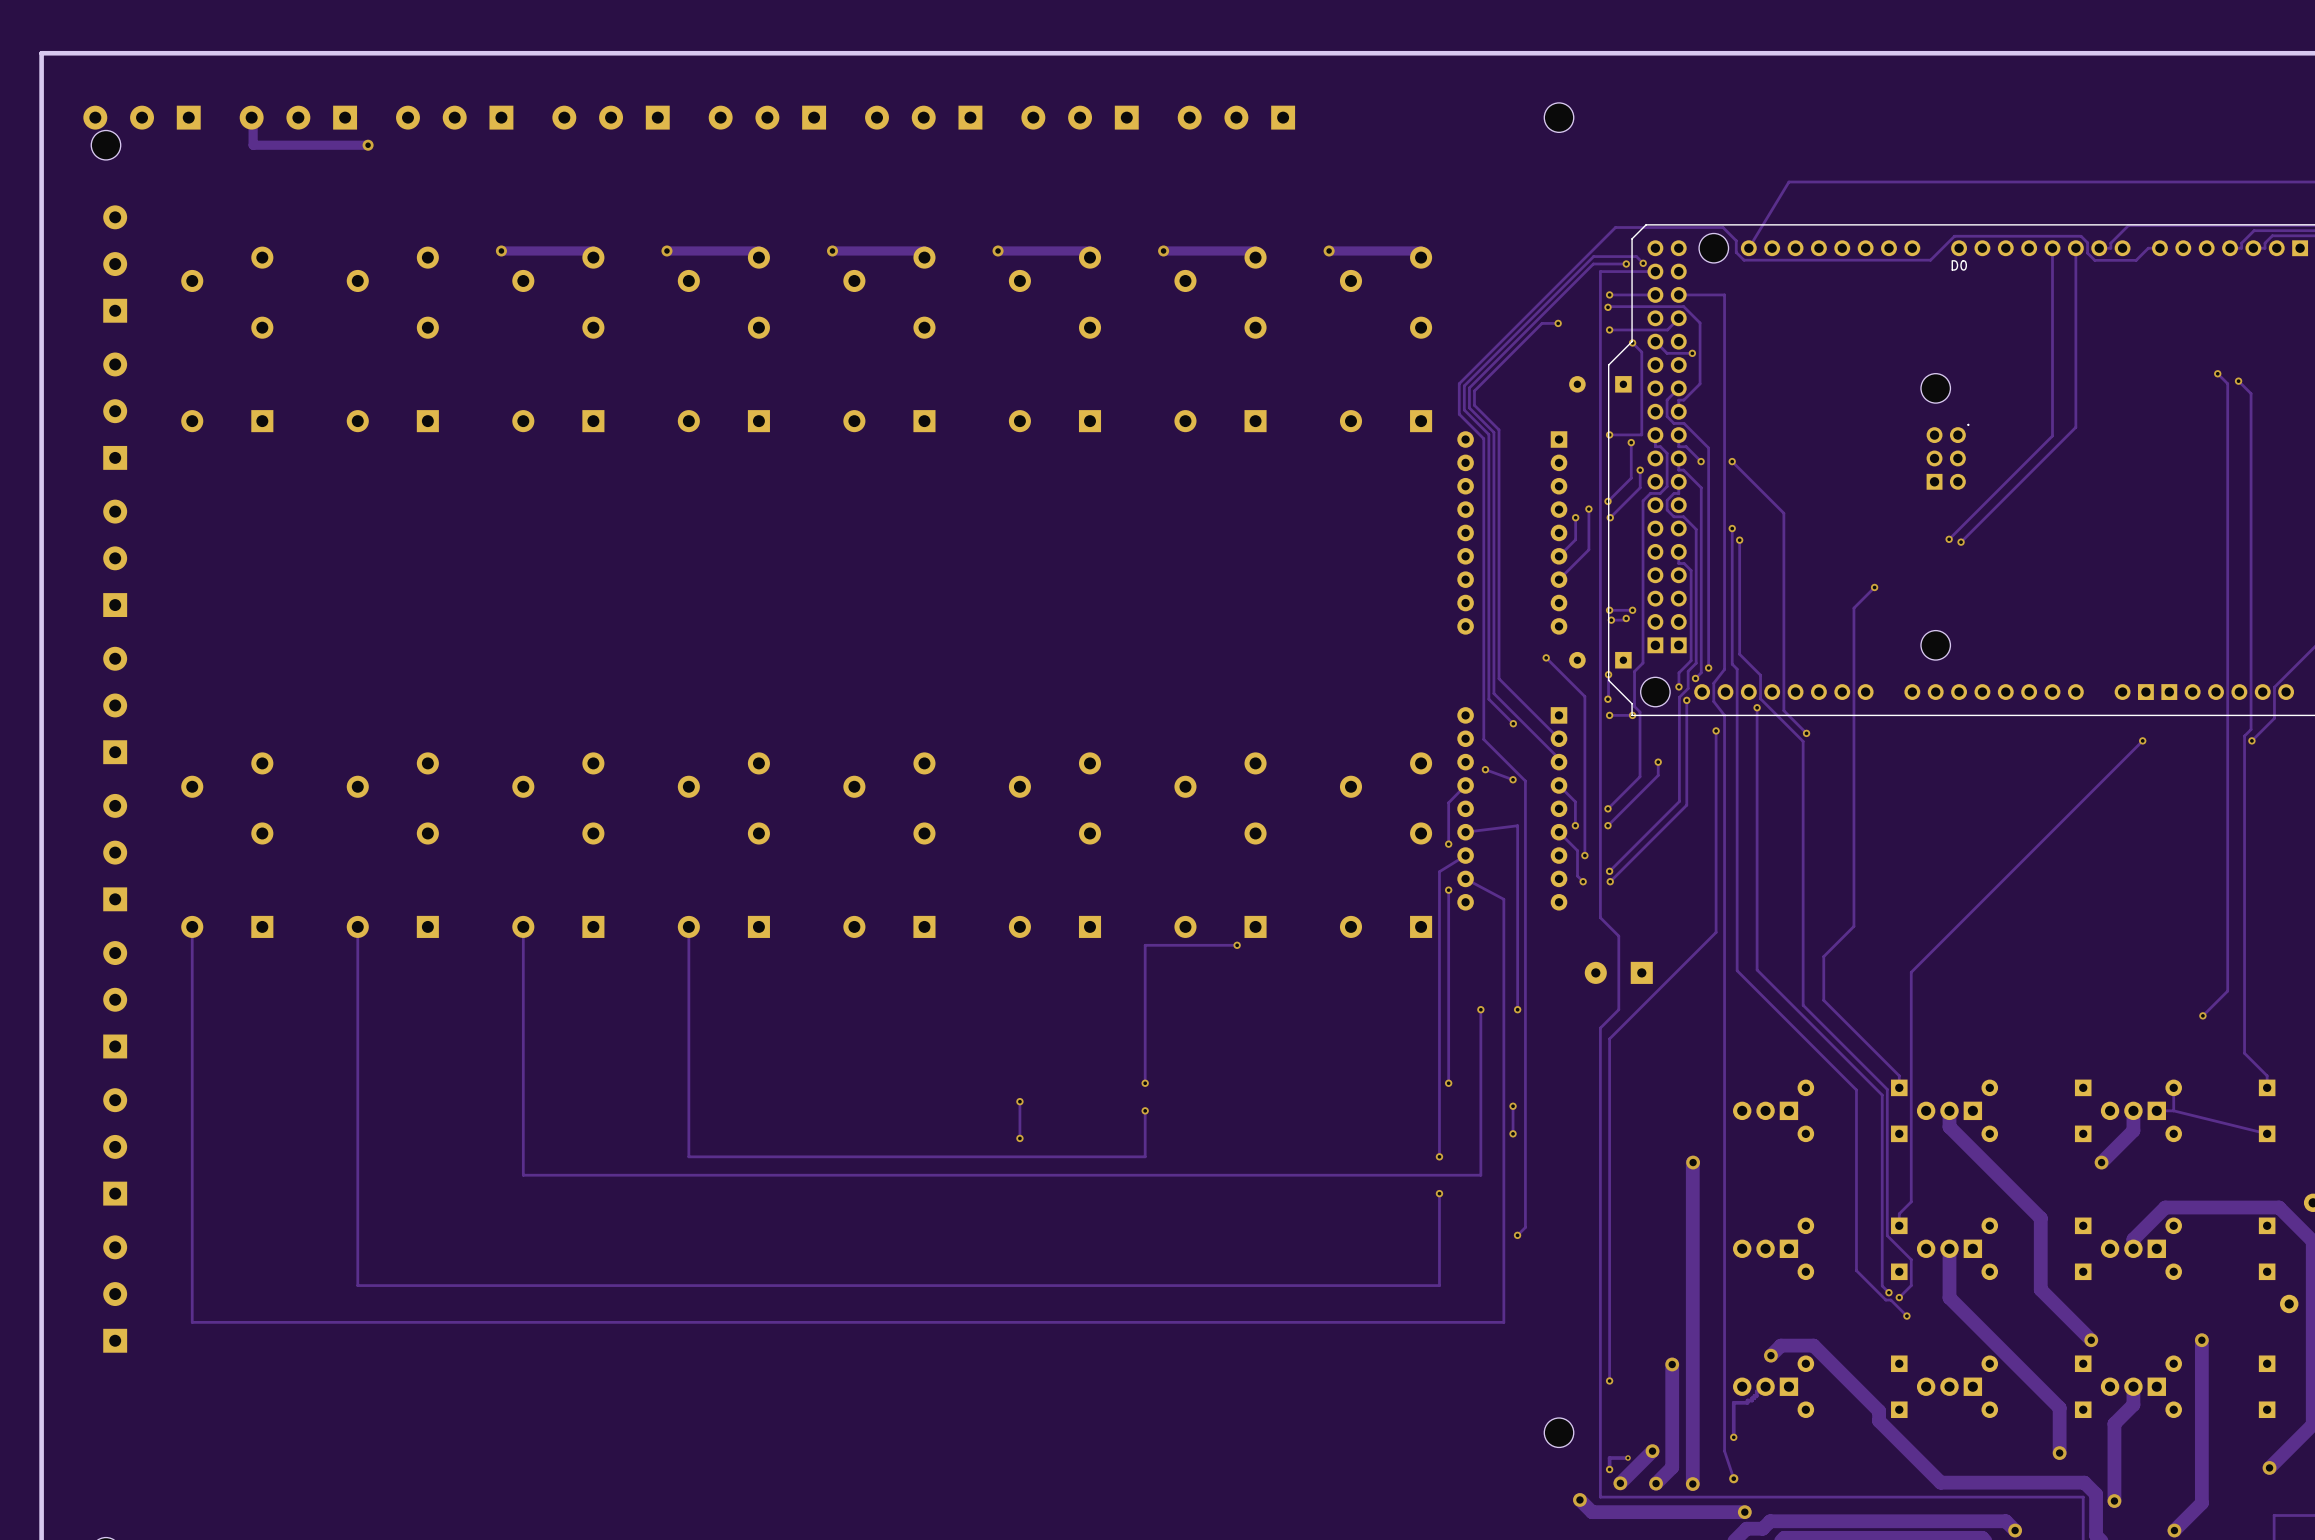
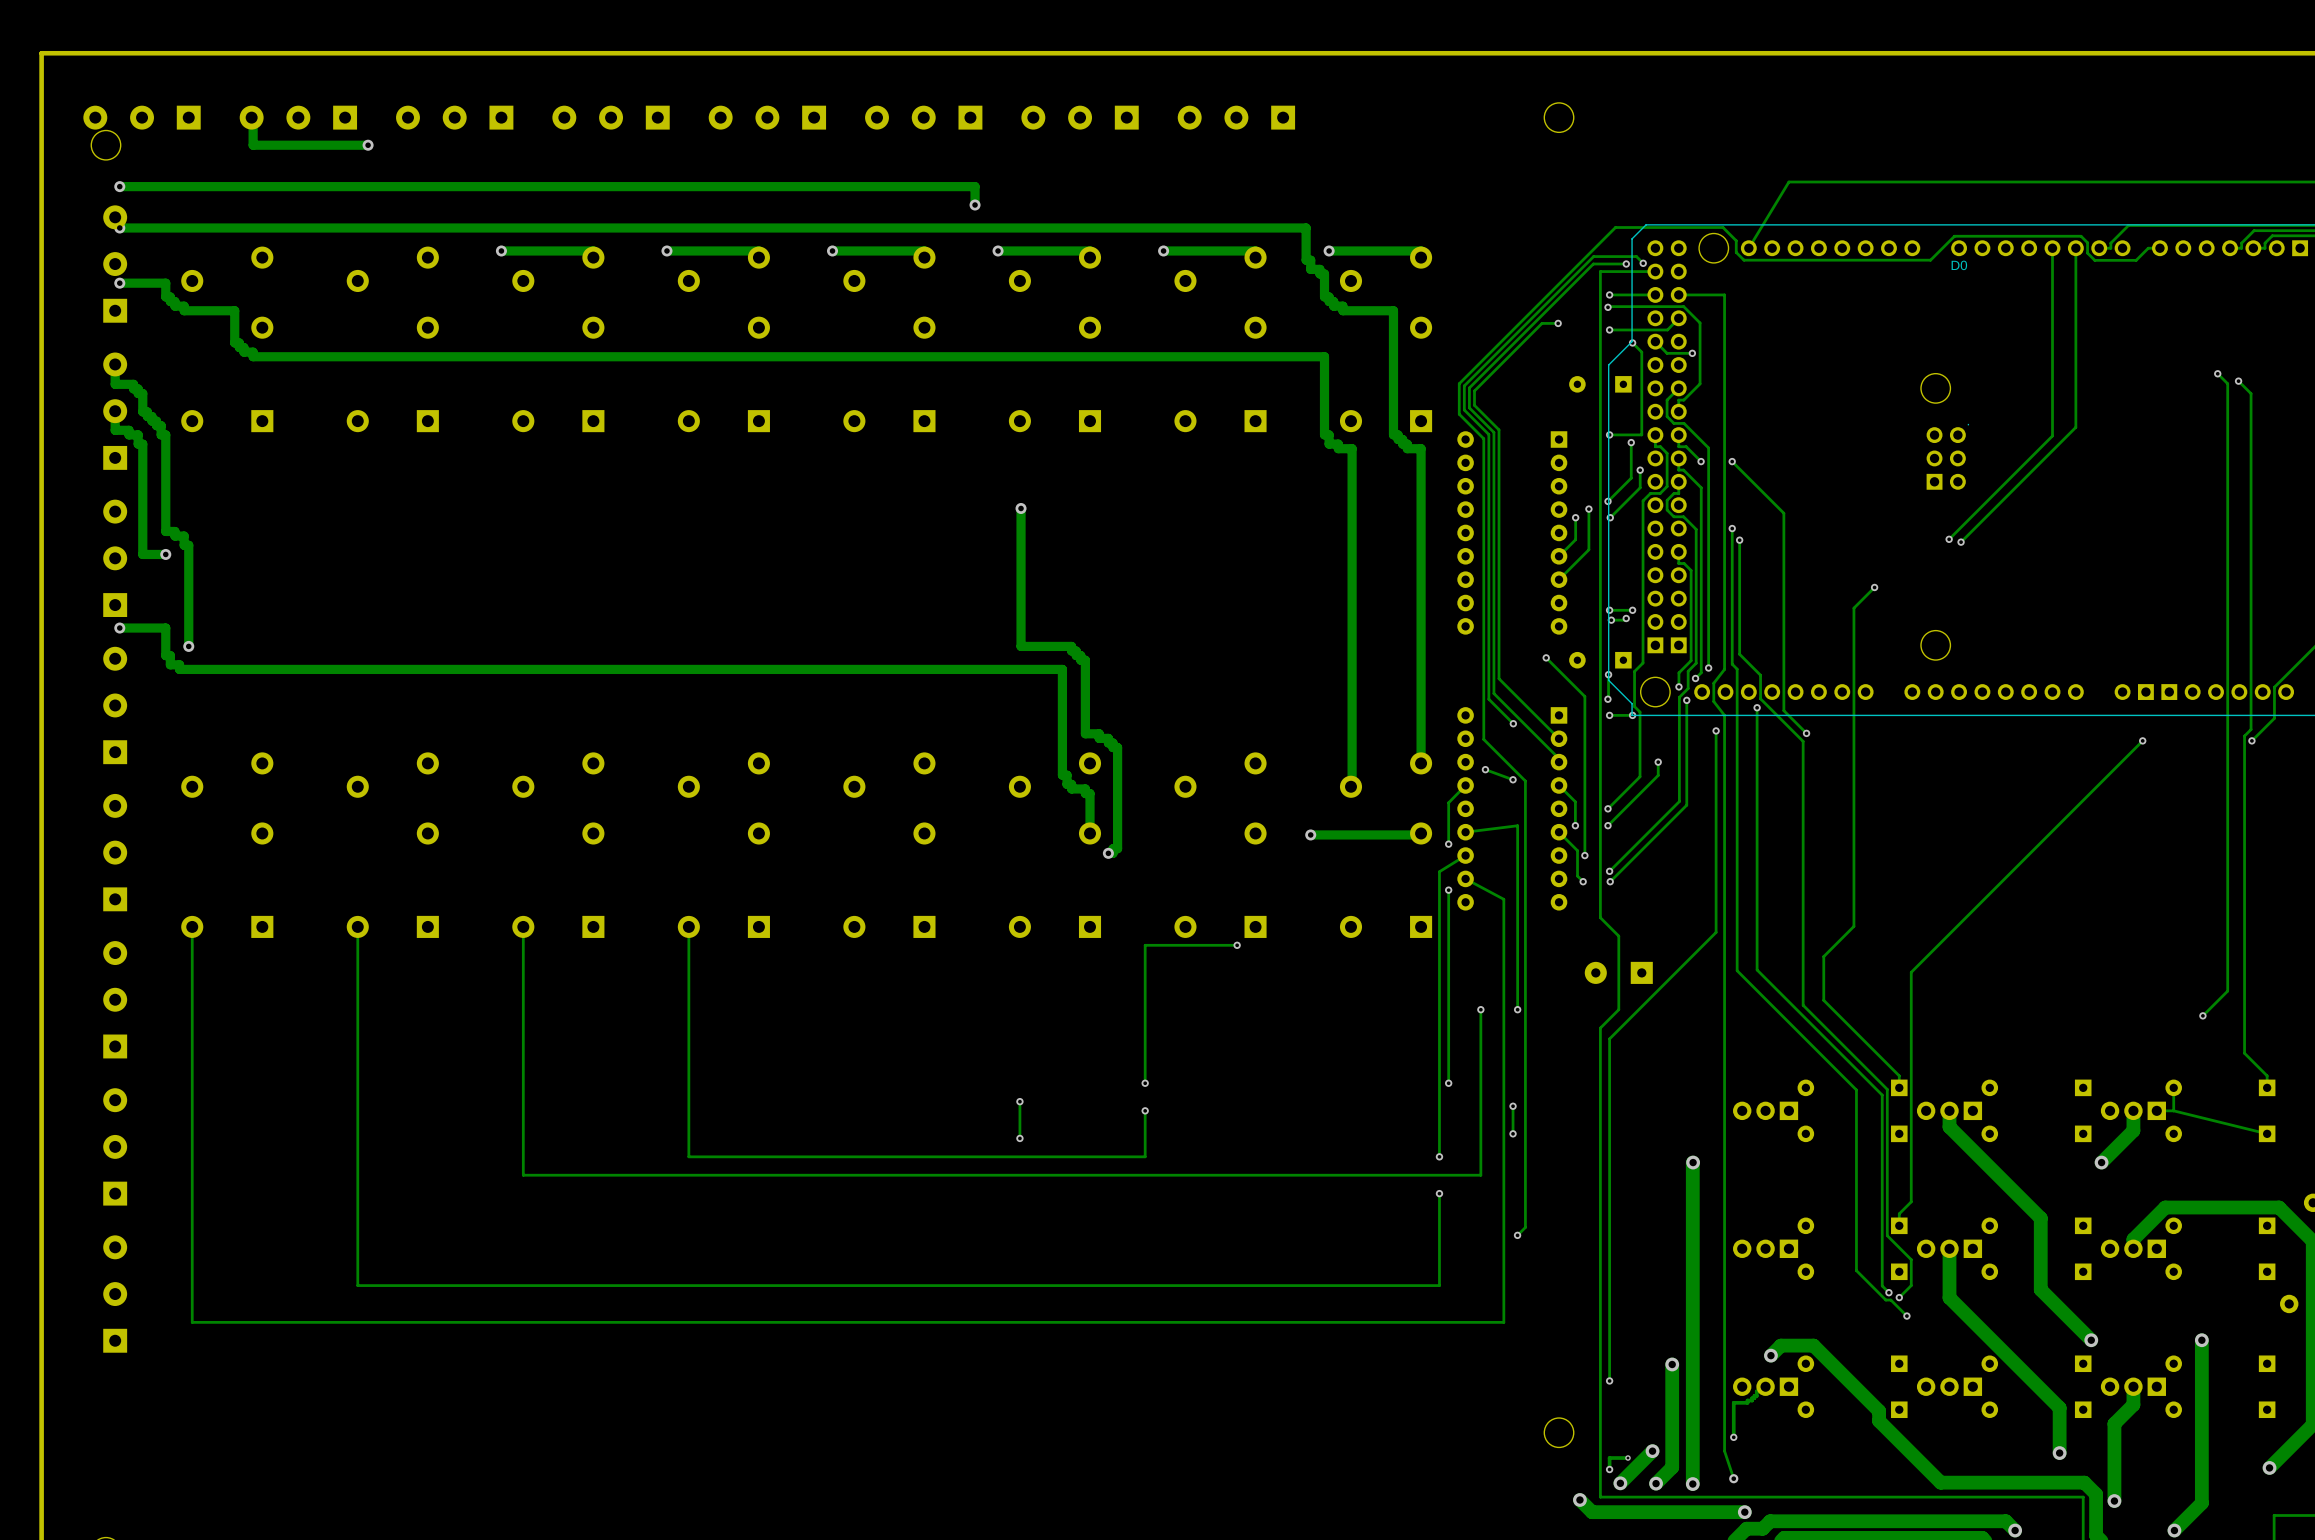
track: none -> (119, 186) (975, 186) (975, 205)
via: none -> (119, 186)
via: none -> (975, 205)
track: none -> (119, 227) (1306, 227) (1306, 260) (1310, 260) (1310, 269) (1319, 269) (1319, 273) (1324, 273) (1324, 296) (1329, 296) (1329, 301) (1333, 301) (1333, 306) (1342, 306) (1342, 310) (1393, 310) (1393, 434) (1398, 434) (1398, 439) (1402, 439) (1402, 444) (1407, 444) (1407, 448) (1421, 448) (1421, 761)
via: none -> (119, 227)
track: none -> (119, 283) (165, 283) (165, 296) (170, 296) (170, 301) (174, 301) (174, 306) (184, 306) (184, 310) (234, 310) (234, 342) (239, 342) (239, 347) (243, 347) (243, 352) (253, 352) (253, 356) (1324, 356) (1324, 434) (1329, 434) (1329, 444) (1338, 444) (1338, 448) (1352, 448) (1352, 788)
via: none -> (119, 283)
track: none -> (115, 365) (115, 384) (133, 384) (133, 388) (138, 388) (138, 393) (142, 393) (142, 411) (147, 411) (147, 416) (151, 416) (151, 421) (156, 421) (156, 425) (161, 425) (161, 434) (165, 434) (165, 531) (174, 531) (174, 536) (184, 536) (184, 545) (188, 545) (188, 646)
track: none -> (115, 411) (115, 430) (128, 430) (128, 434) (138, 434) (138, 444) (142, 444) (142, 554) (165, 554)
track: none -> (1021, 508) (1021, 646) (1071, 646) (1071, 651) (1076, 651) (1076, 655) (1080, 655) (1080, 660) (1085, 660) (1085, 733) (1099, 733) (1099, 738) (1108, 738) (1108, 742) (1112, 742) (1112, 747) (1117, 747) (1117, 848) (1112, 848) (1112, 853) (1108, 853)
via: none -> (1021, 508)
via: none -> (165, 554)
track: none -> (119, 628) (165, 628) (165, 655) (170, 655) (170, 664) (179, 664) (179, 669) (1062, 669) (1062, 775) (1067, 775) (1067, 784) (1071, 784) (1071, 788) (1085, 788) (1085, 793) (1090, 793) (1090, 834)
via: none -> (119, 628)
via: none -> (188, 646)
via: none -> (1310, 834)
track: none -> (1421, 834) (1310, 834)
via: none -> (1108, 853)

